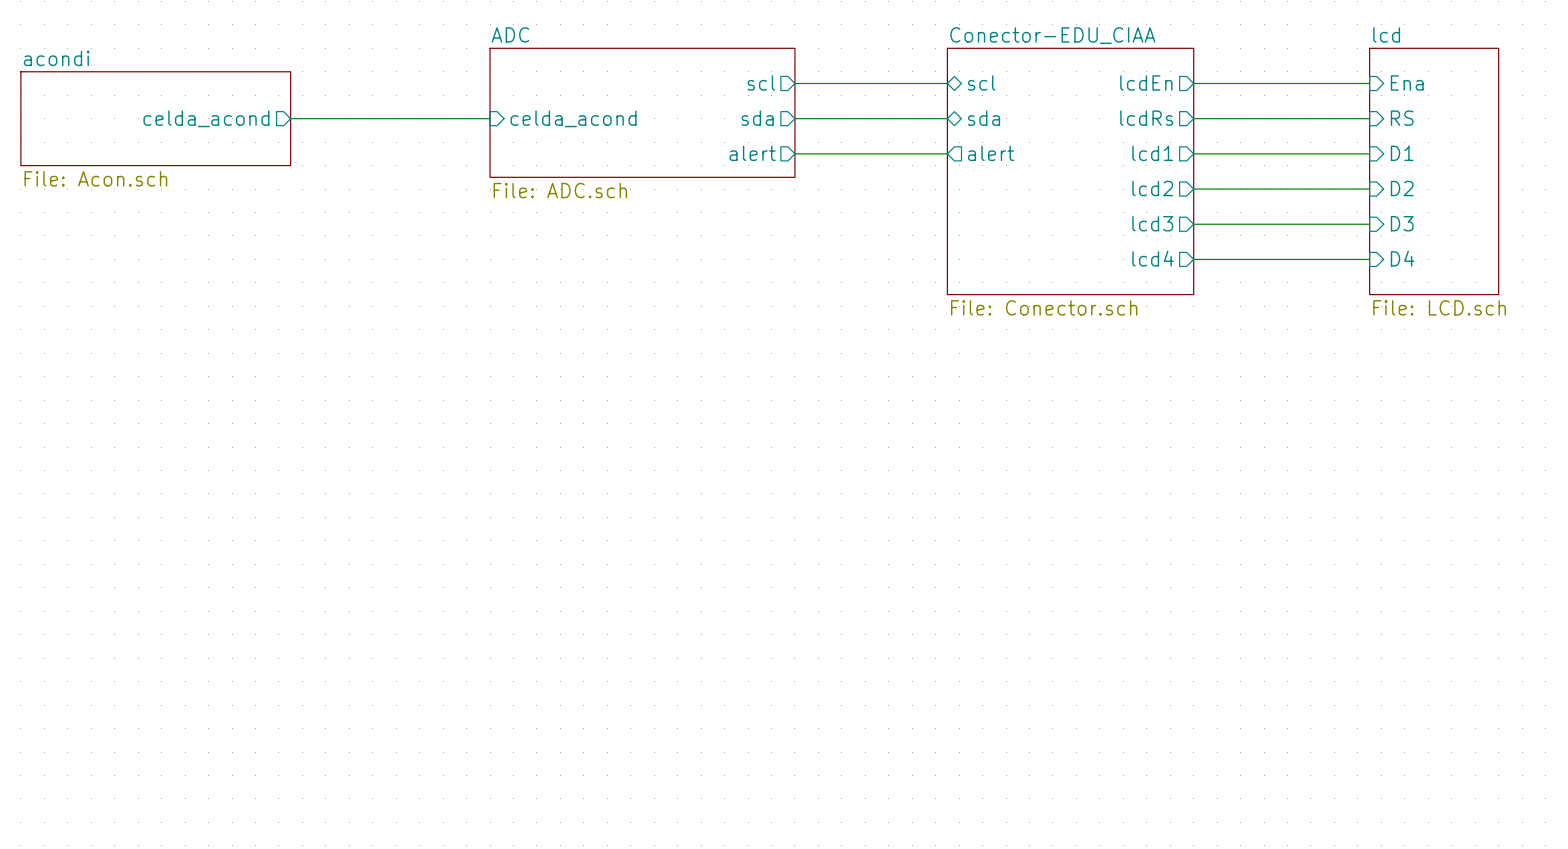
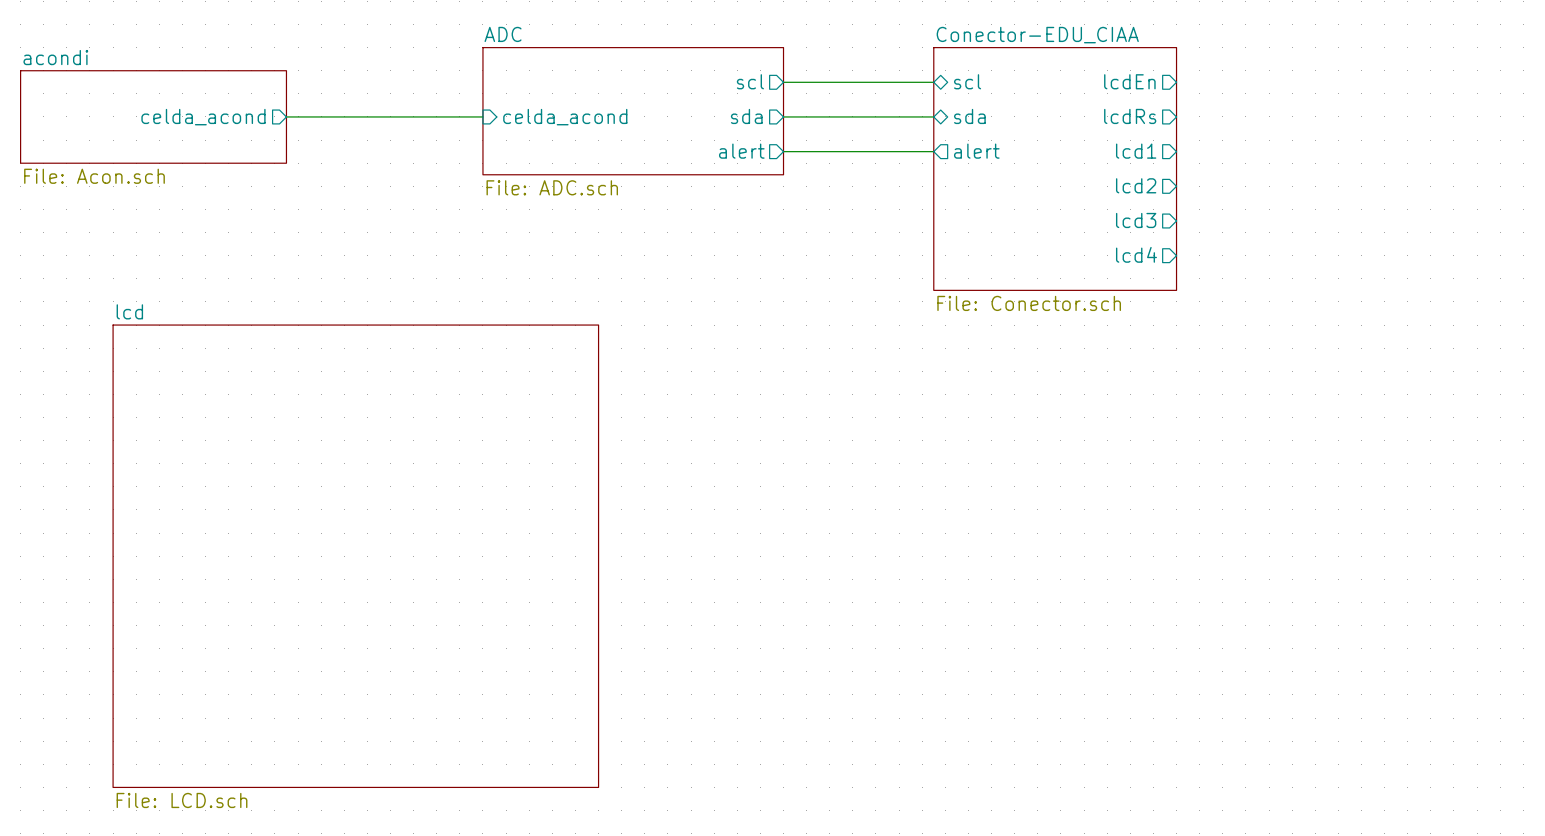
sheet pin: Ena (1407, 82) -> none
wire: (1193, 83) (1369, 83) -> none
wire: (1193, 118) (1369, 118) -> none
sheet pin: RS (1402, 118) -> none
wire: (1193, 153) (1369, 153) -> none
sheet pin: D1 (1402, 153) -> none
sheet lcd: File: LCD.sch (1434, 171) -> none
sheet pin: D2 (1402, 188) -> none
wire: (1193, 189) (1369, 189) -> none
sheet pin: D3 (1402, 223) -> none
wire: (1193, 224) (1369, 224) -> none
sheet pin: D4 (1402, 258) -> none
wire: (1193, 259) (1369, 259) -> none
sheet lcd: none -> File: LCD.sch (355, 556)

